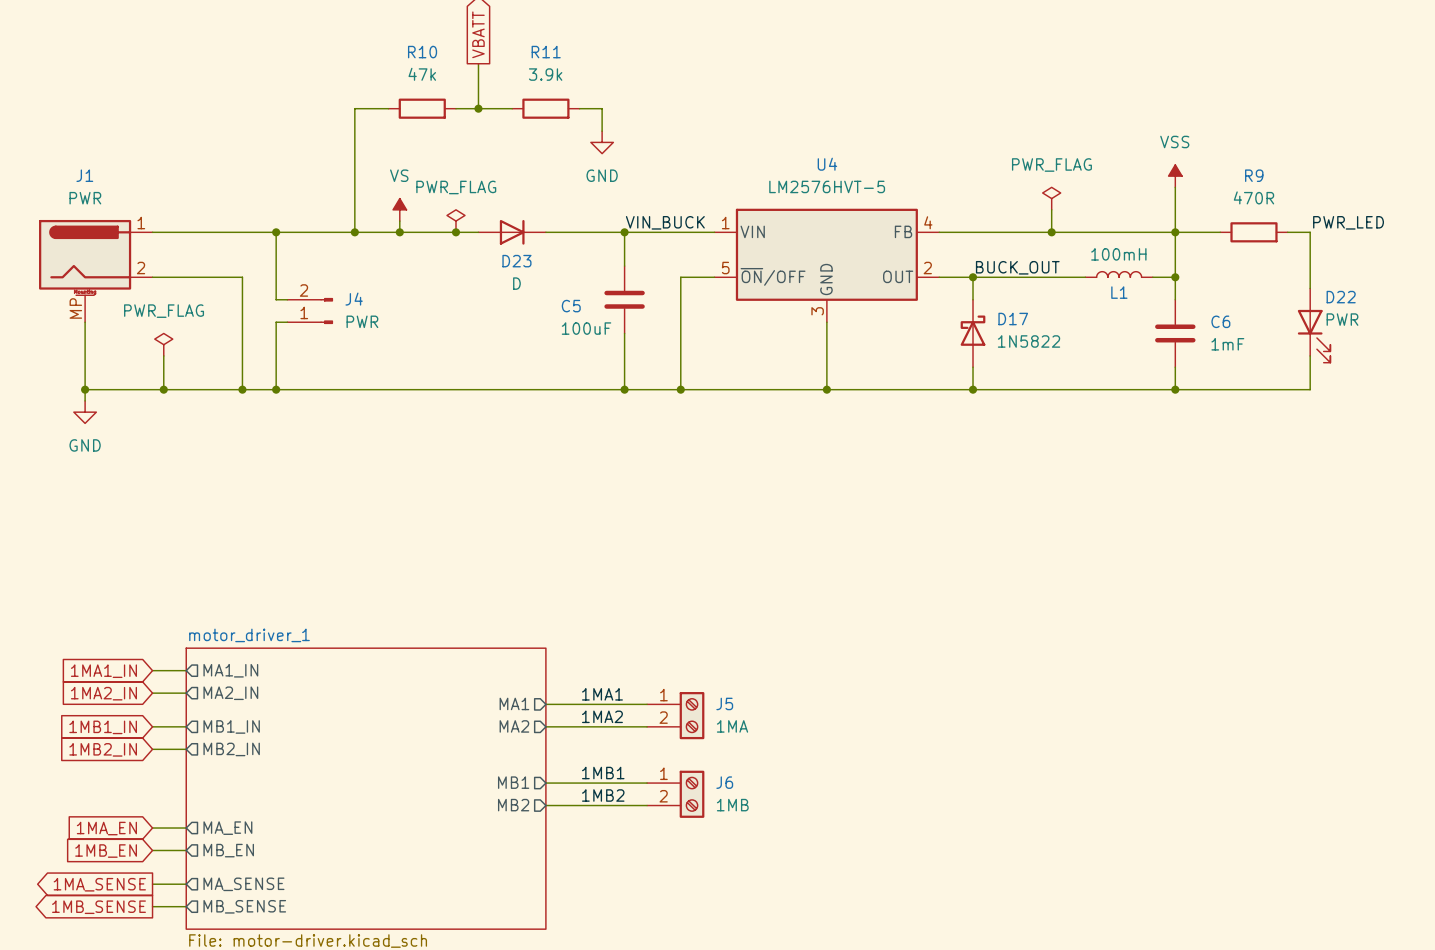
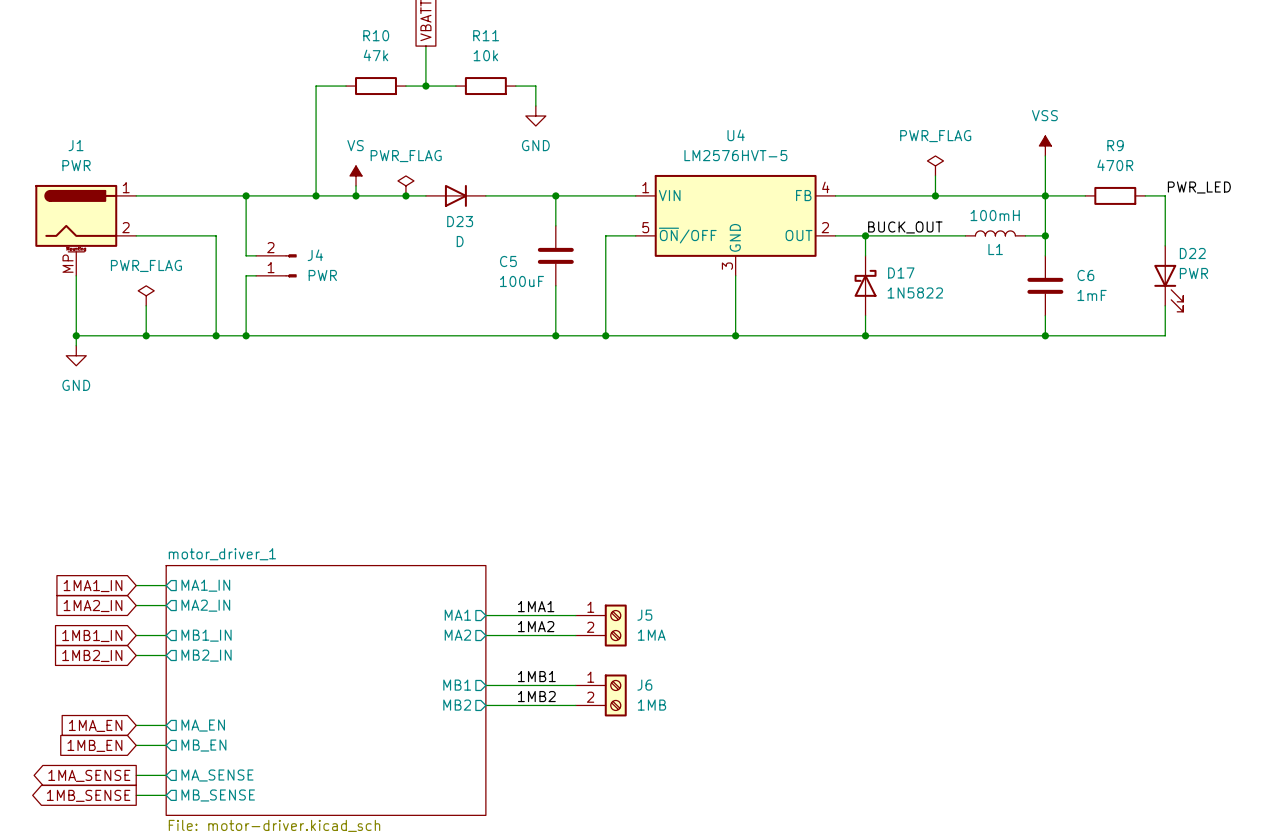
R11 value: 3.9k (545, 74) -> 10k (485, 55)
label: VIN_BUCK (665, 222) -> none

